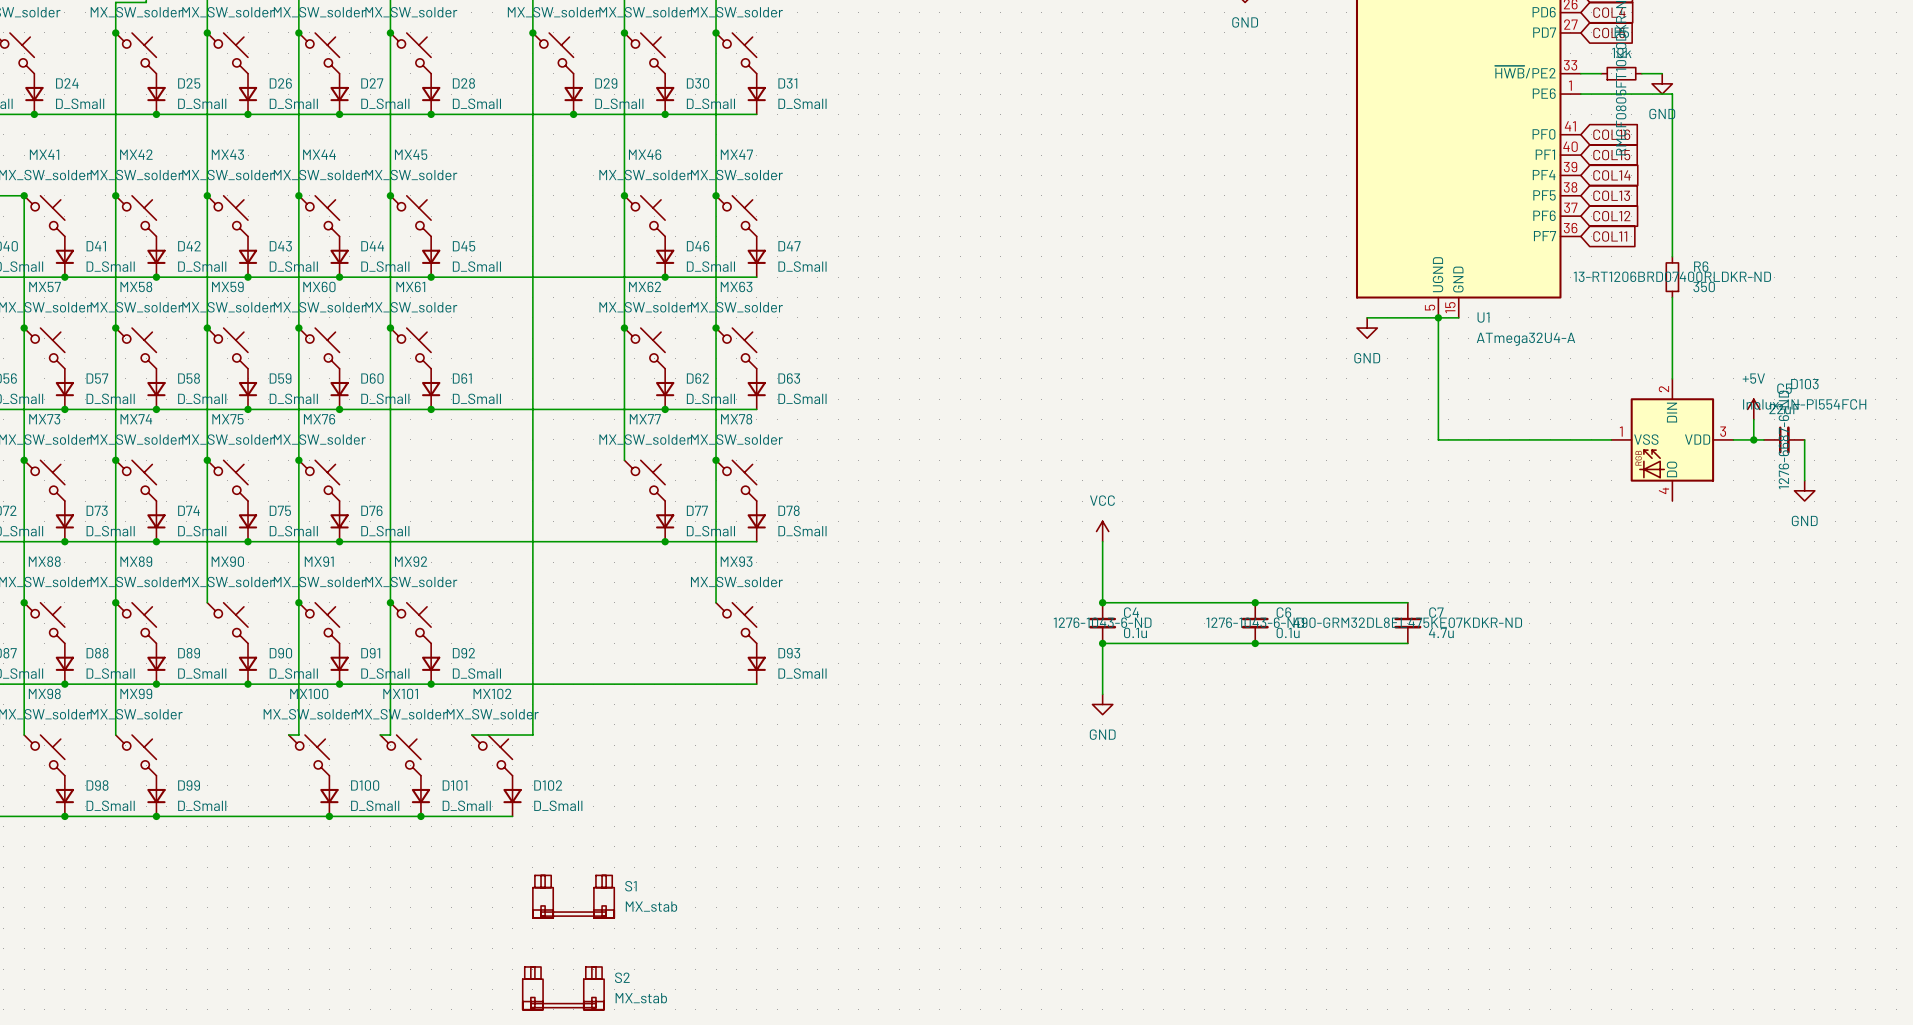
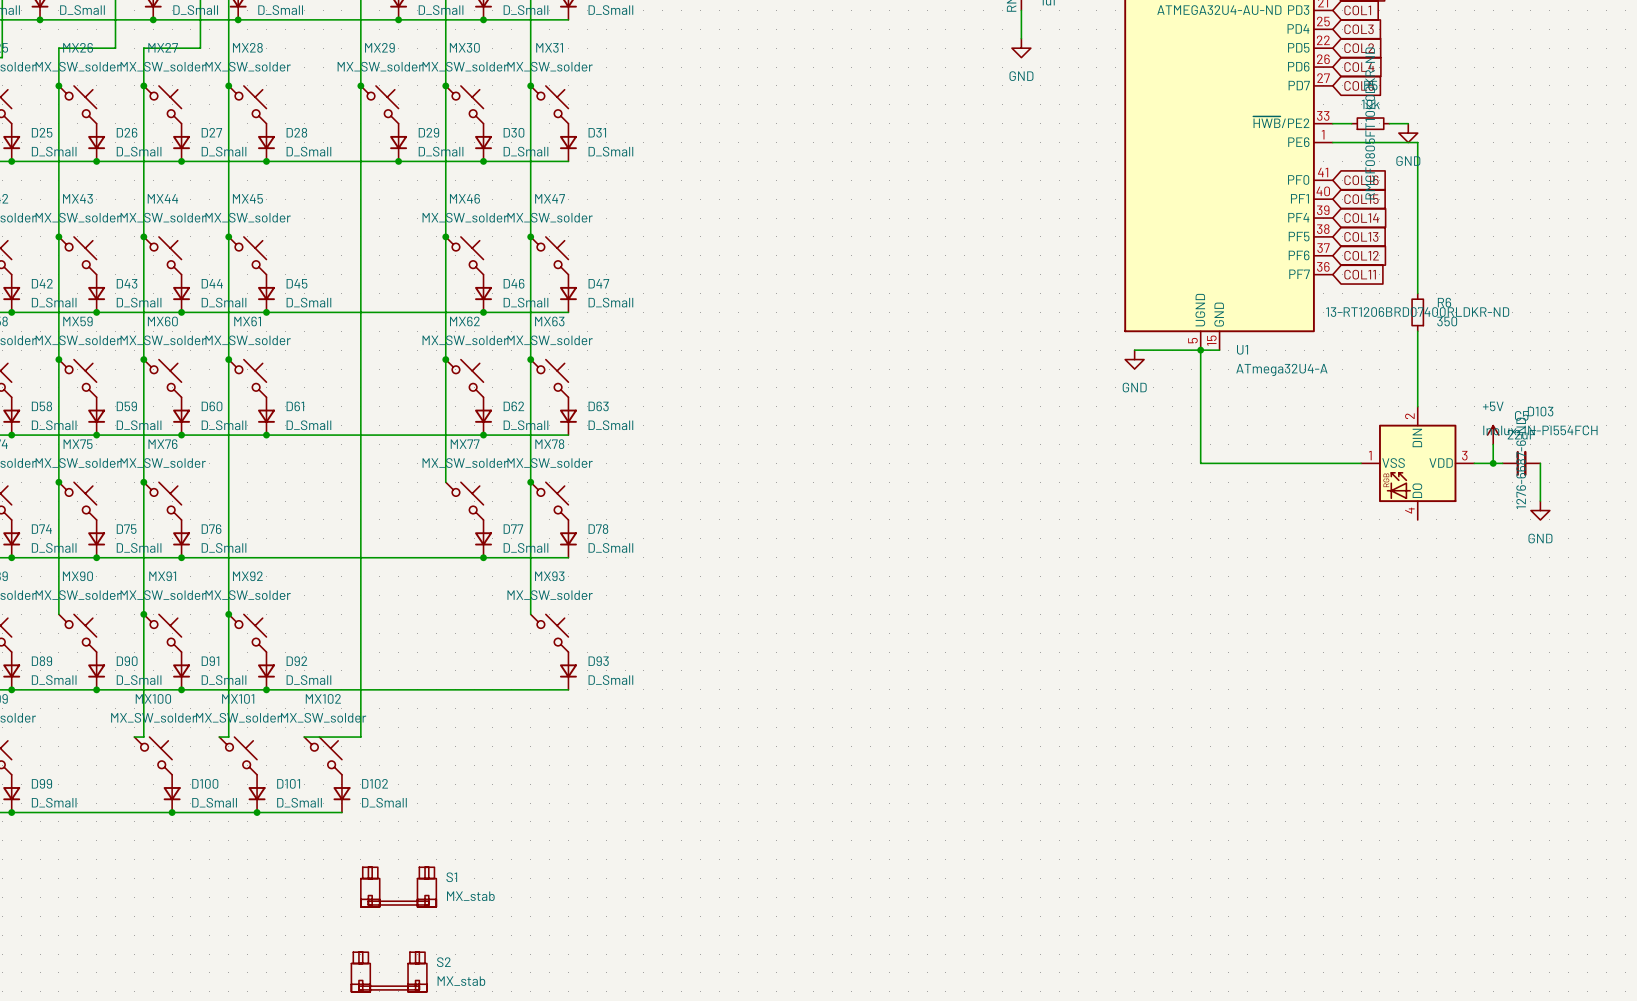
power symbol: VCC (1102, 531) -> none
wire: (1102, 541) (1102, 602) (1407, 602) -> none
junction: (1102, 602) -> none
junction: (1255, 602) -> none
C4: 0.1u (1102, 623) -> none
C6: 0.1u (1255, 623) -> none
C7: 4.7u (1407, 623) -> none
junction: (1102, 643) -> none
junction: (1255, 643) -> none
wire: (1407, 643) (1102, 643) (1102, 694) -> none
power symbol: GND (1102, 704) -> none

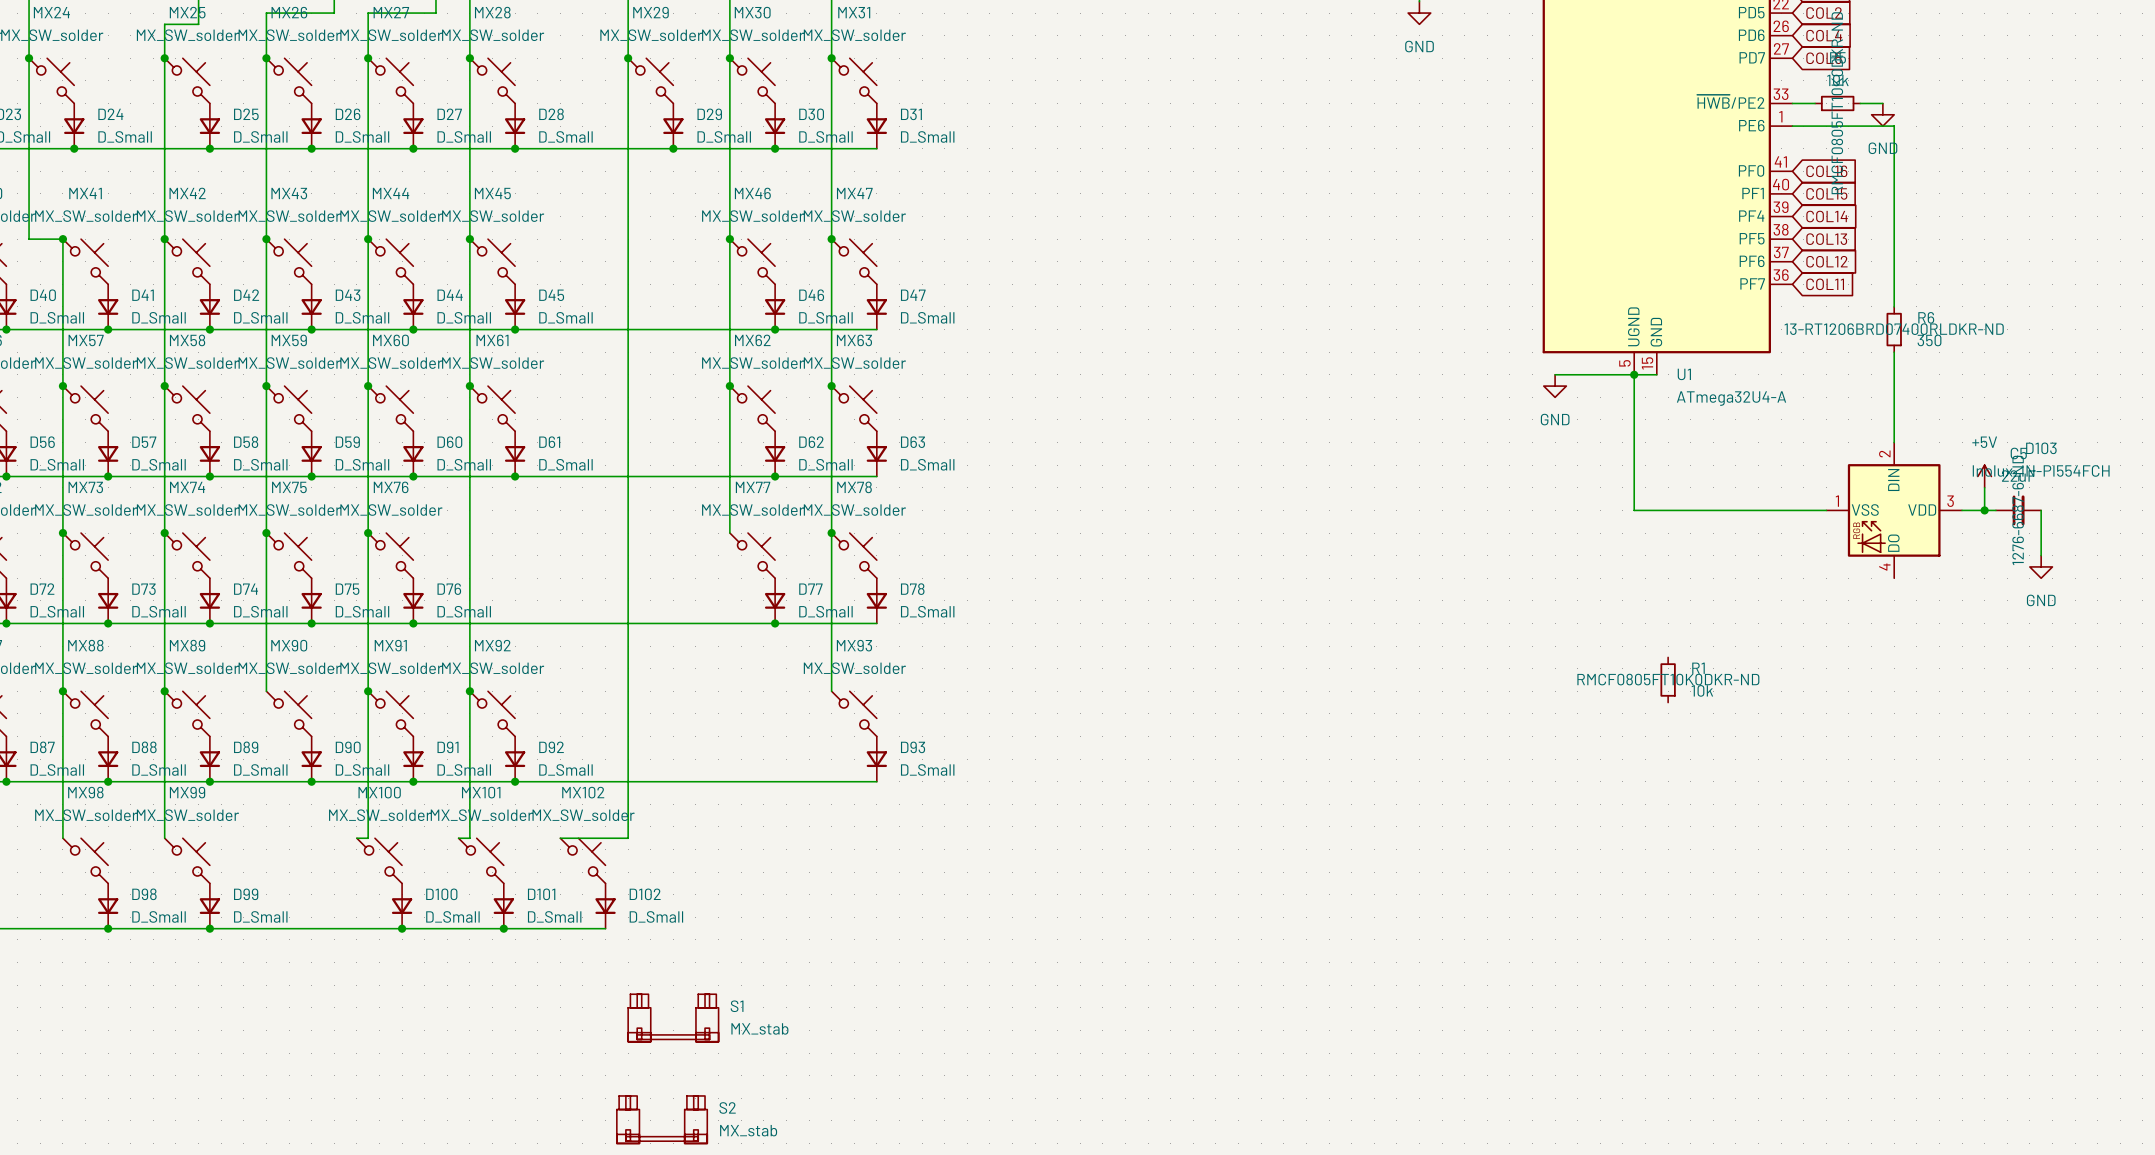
R1: none -> 10k (1668, 679)

